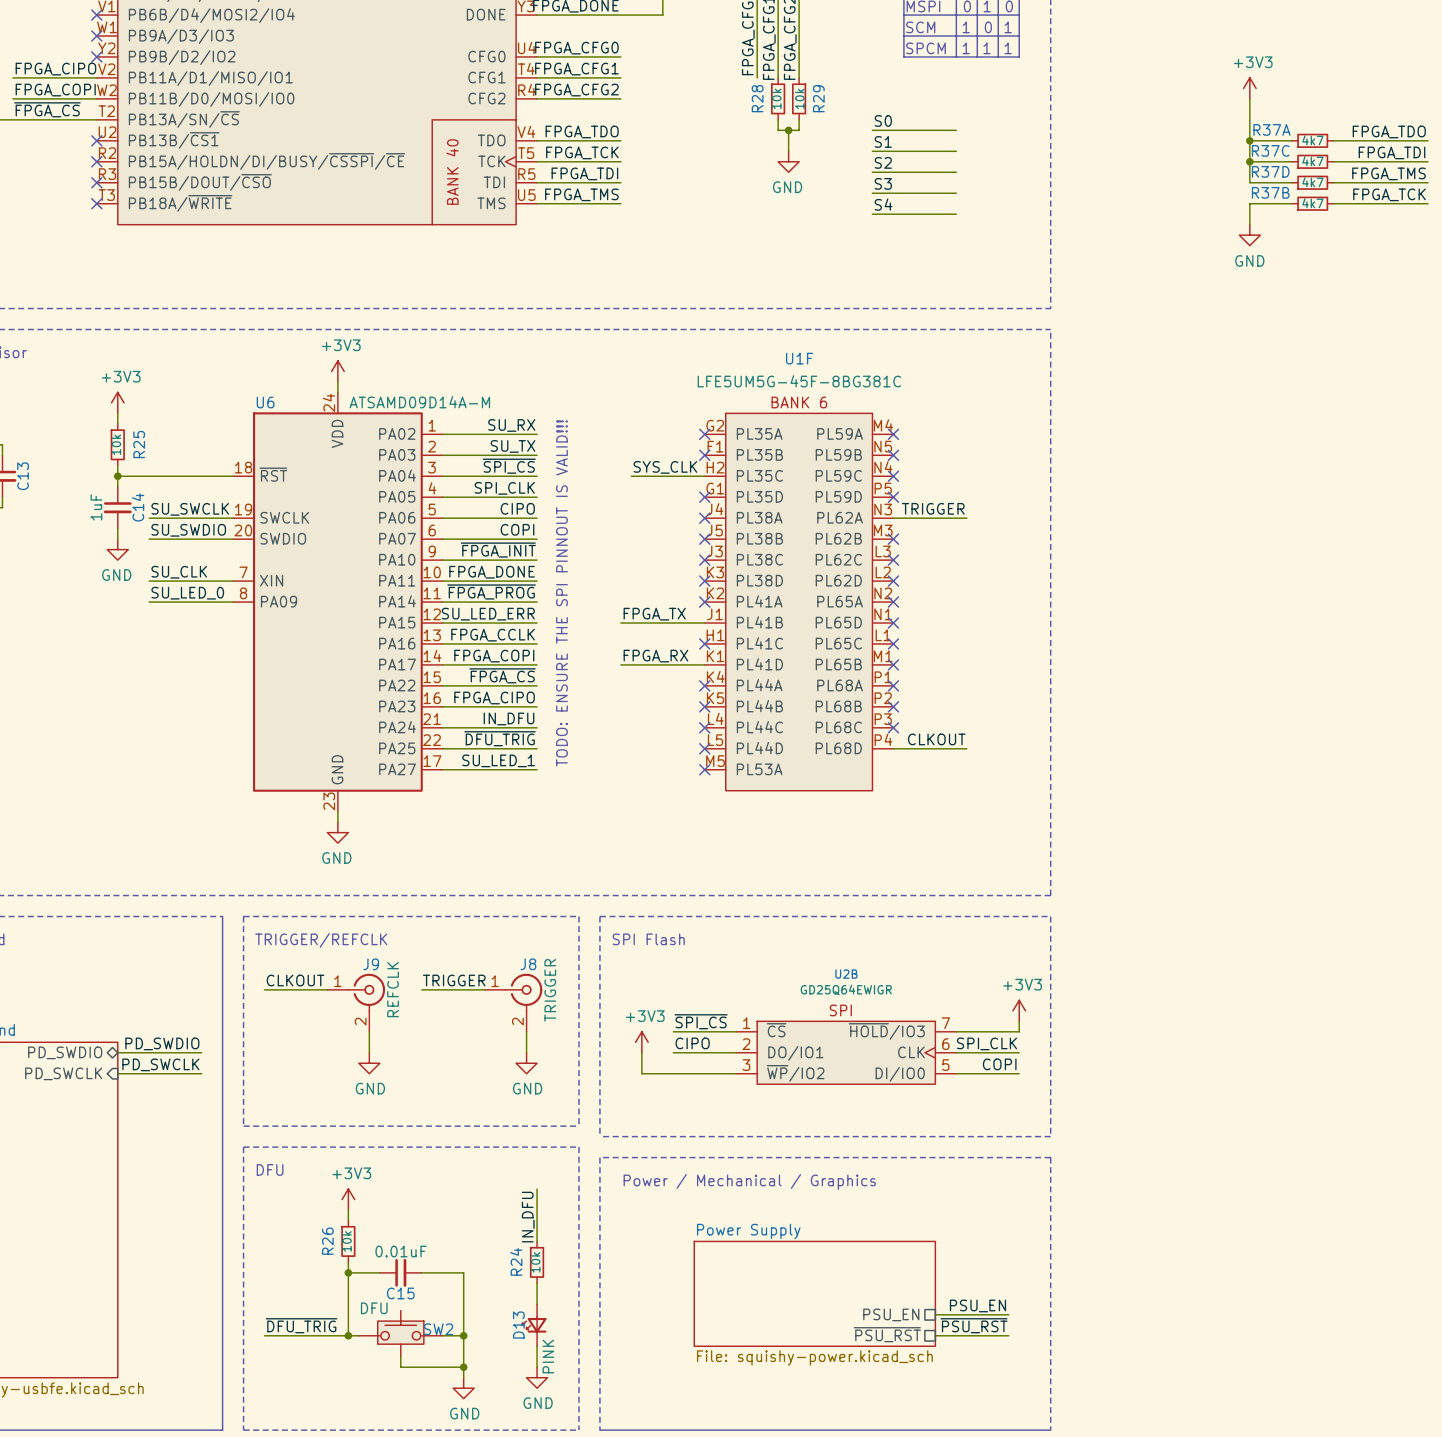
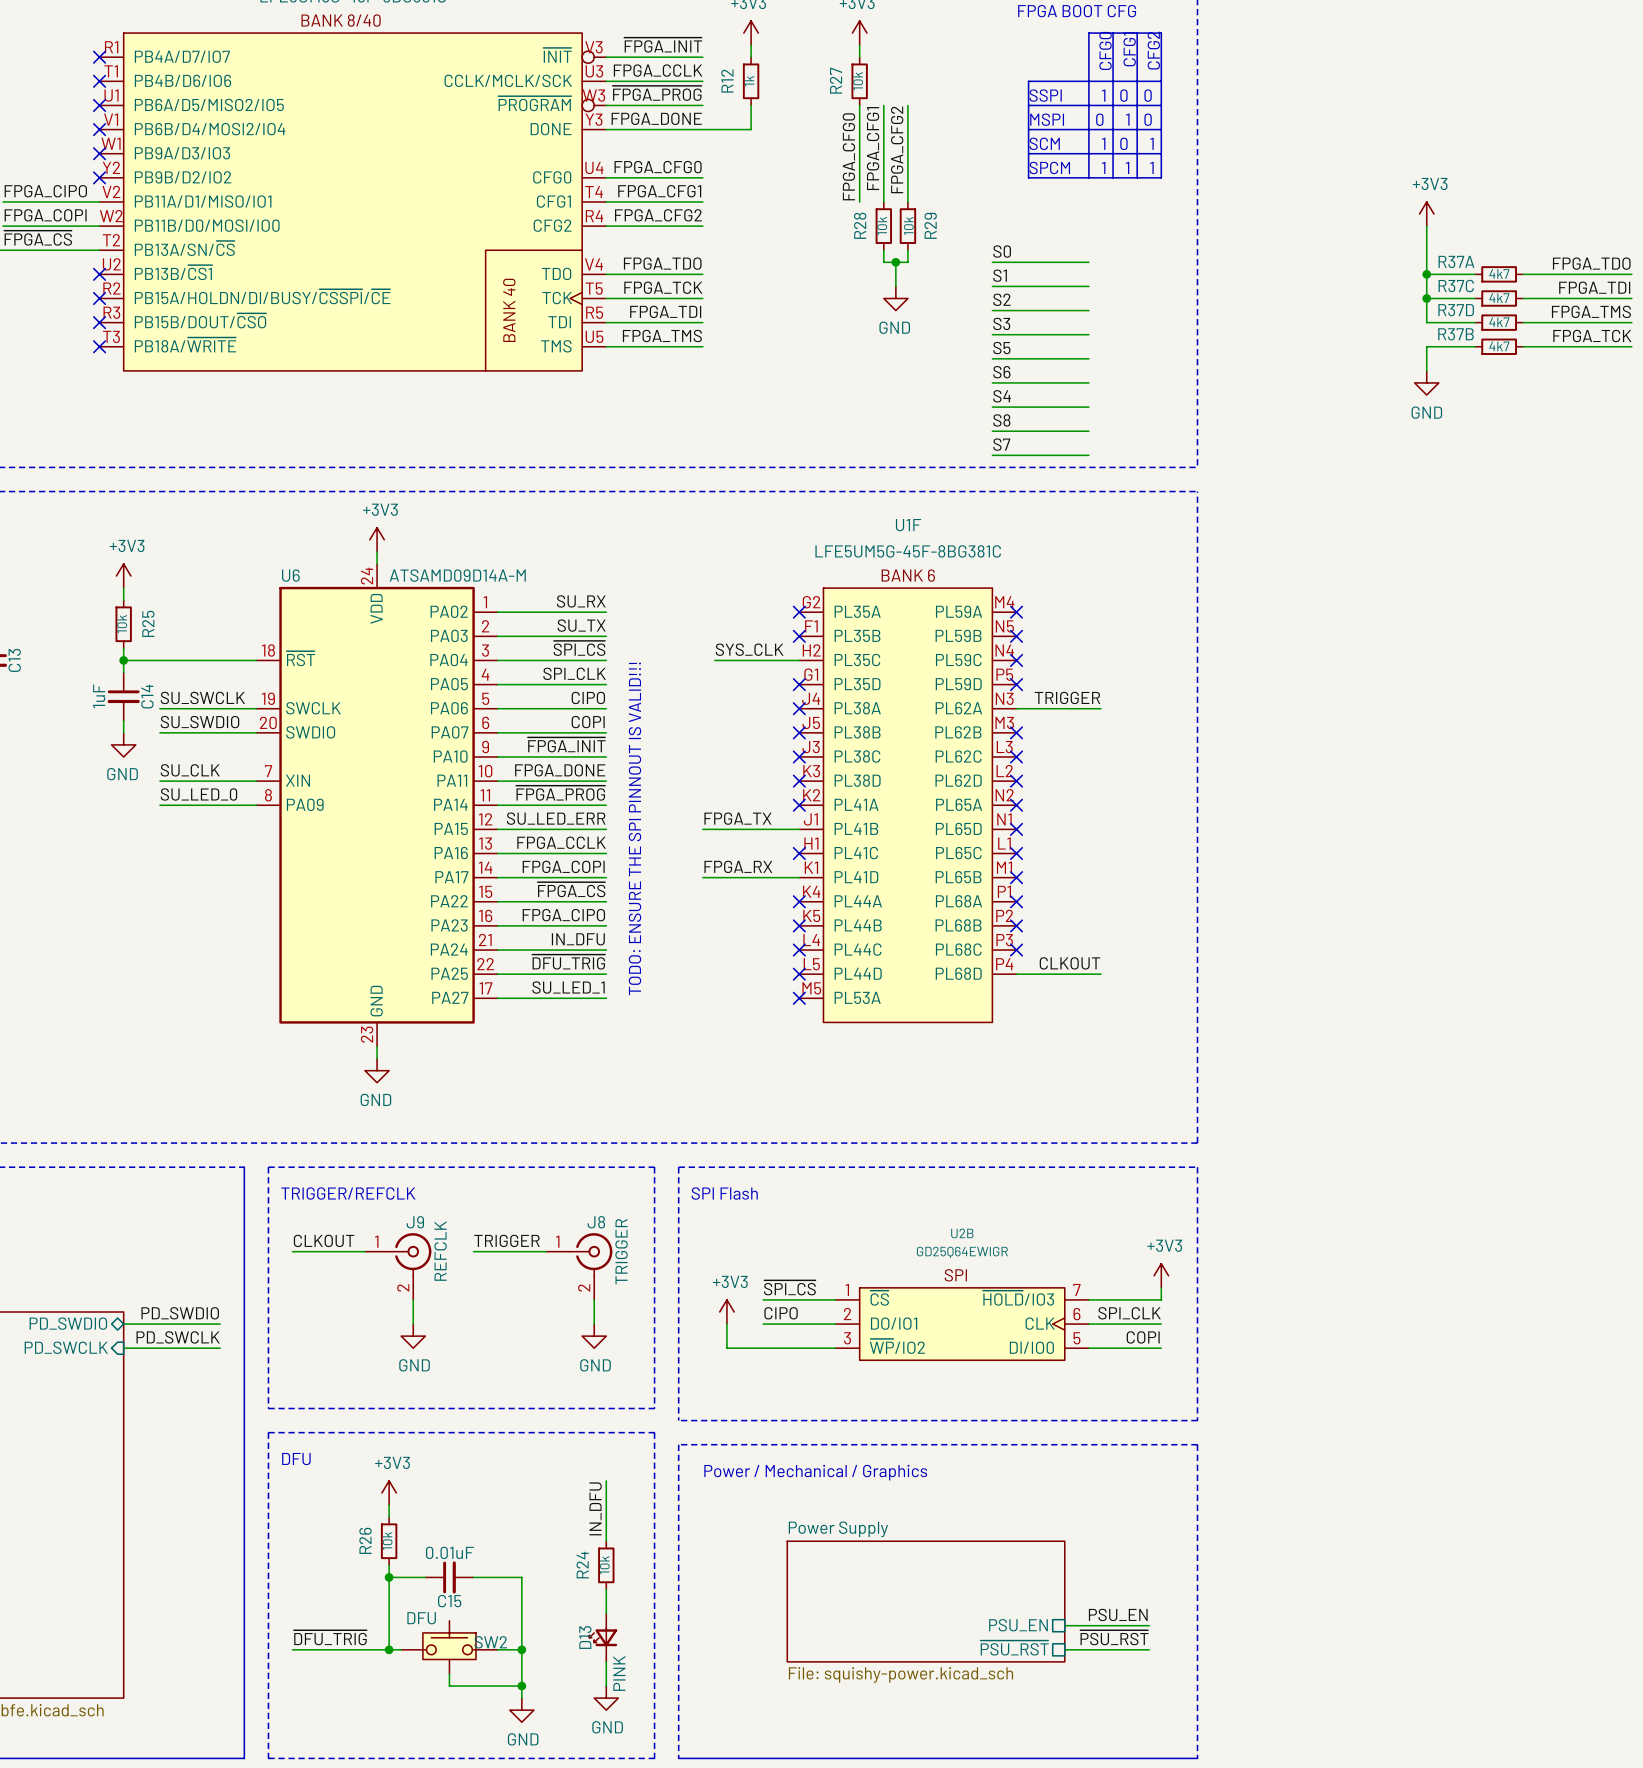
label: S4 (883, 204) -> S5 (1001, 348)
label: none -> S6 (1001, 372)
wire: none -> (992, 382) (1088, 382)
label: none -> S4 (1002, 396)
wire: none -> (992, 407) (1088, 407)
label: none -> S8 (1001, 420)
wire: none -> (992, 431) (1088, 431)
label: none -> S7 (1001, 444)
wire: none -> (992, 455) (1088, 455)

